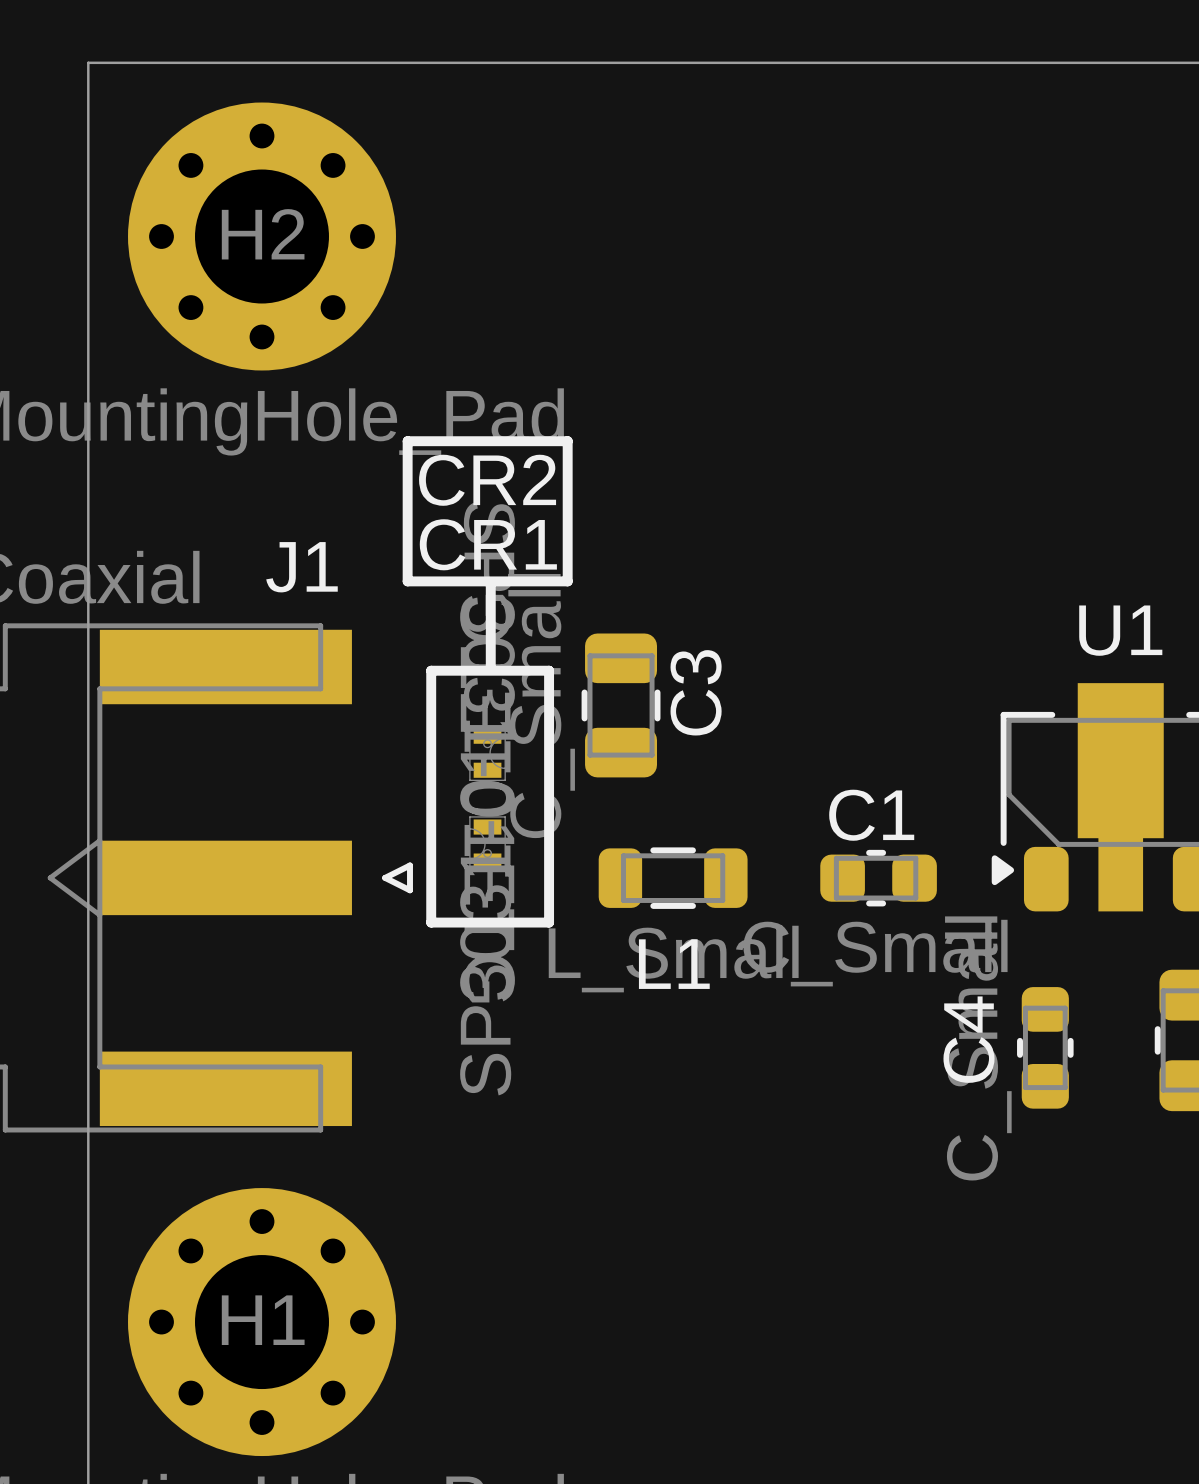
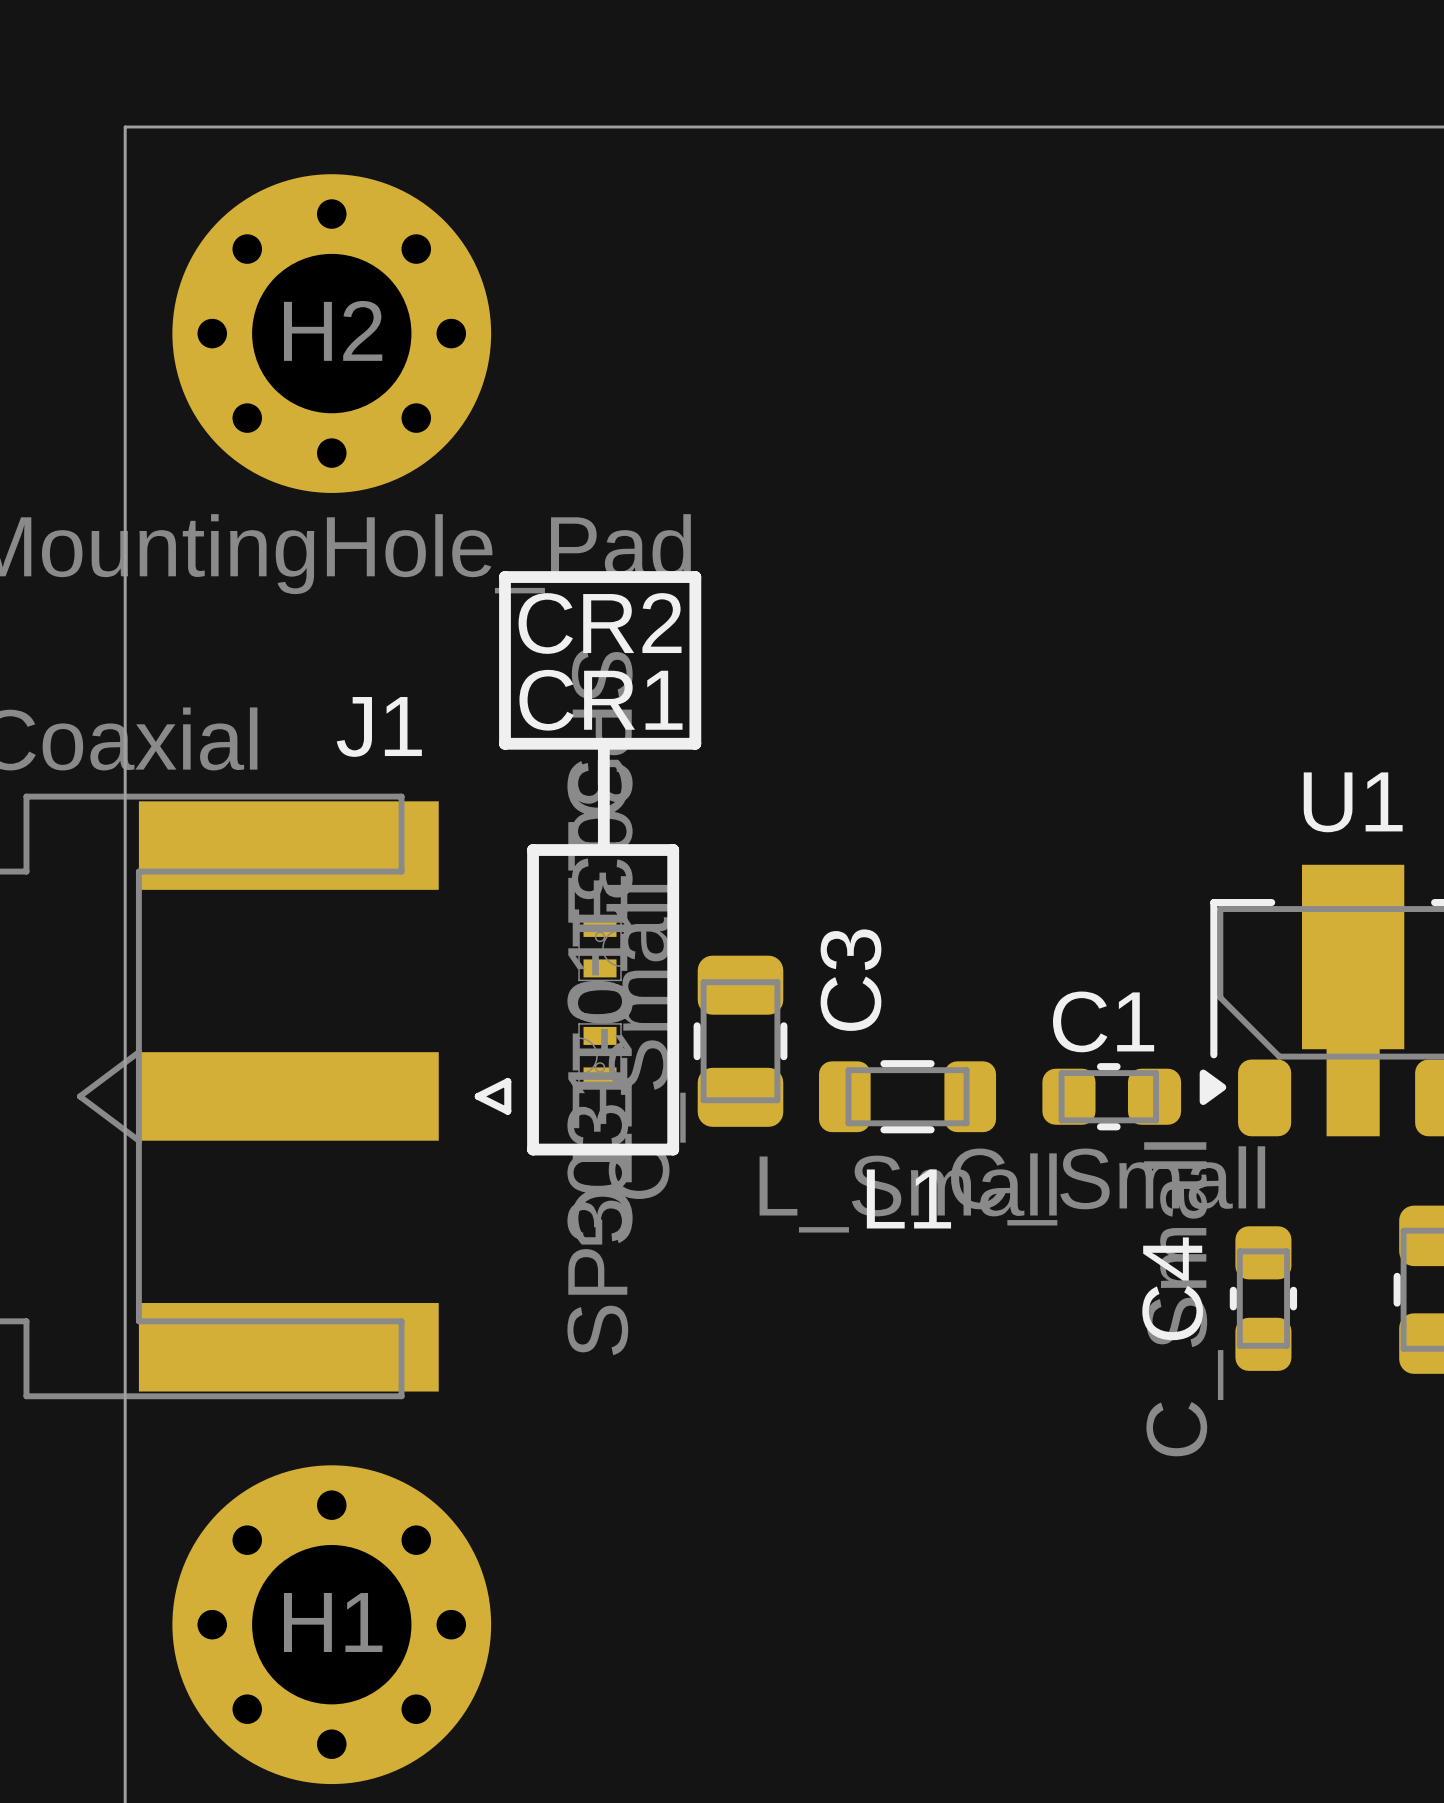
C3 name position: C3 (696, 692) -> C3 (851, 980)
C3 position: (621, 705) -> (740, 1041)
L1 position: (673, 878) -> (907, 1096)
C1 position: (878, 878) -> (1111, 1096)

